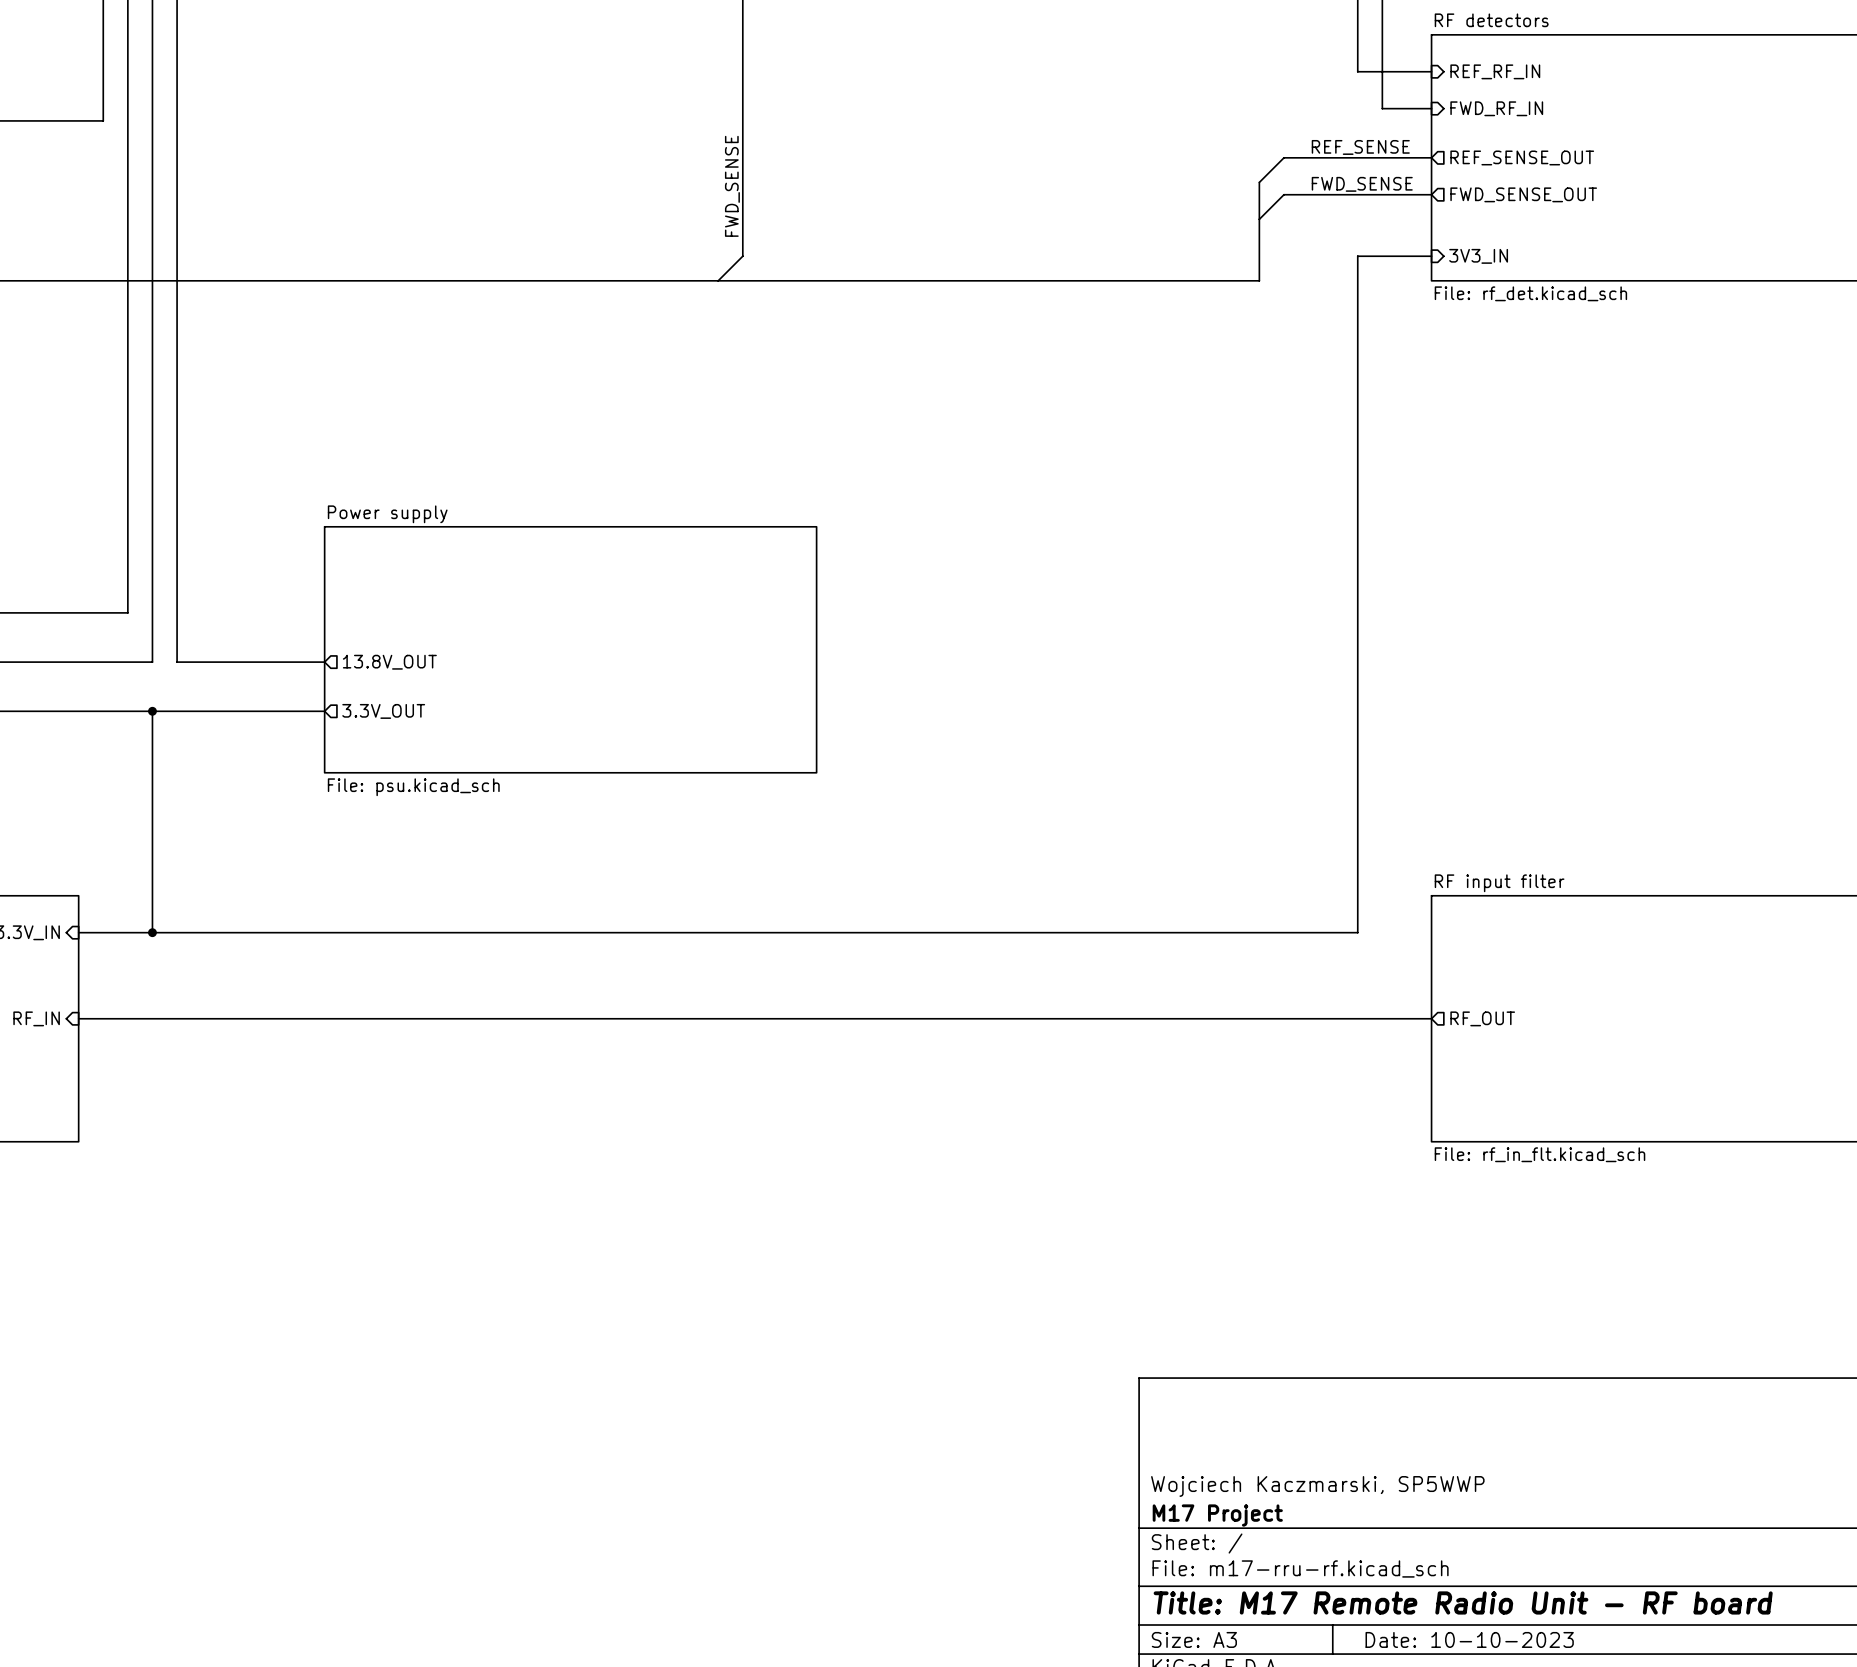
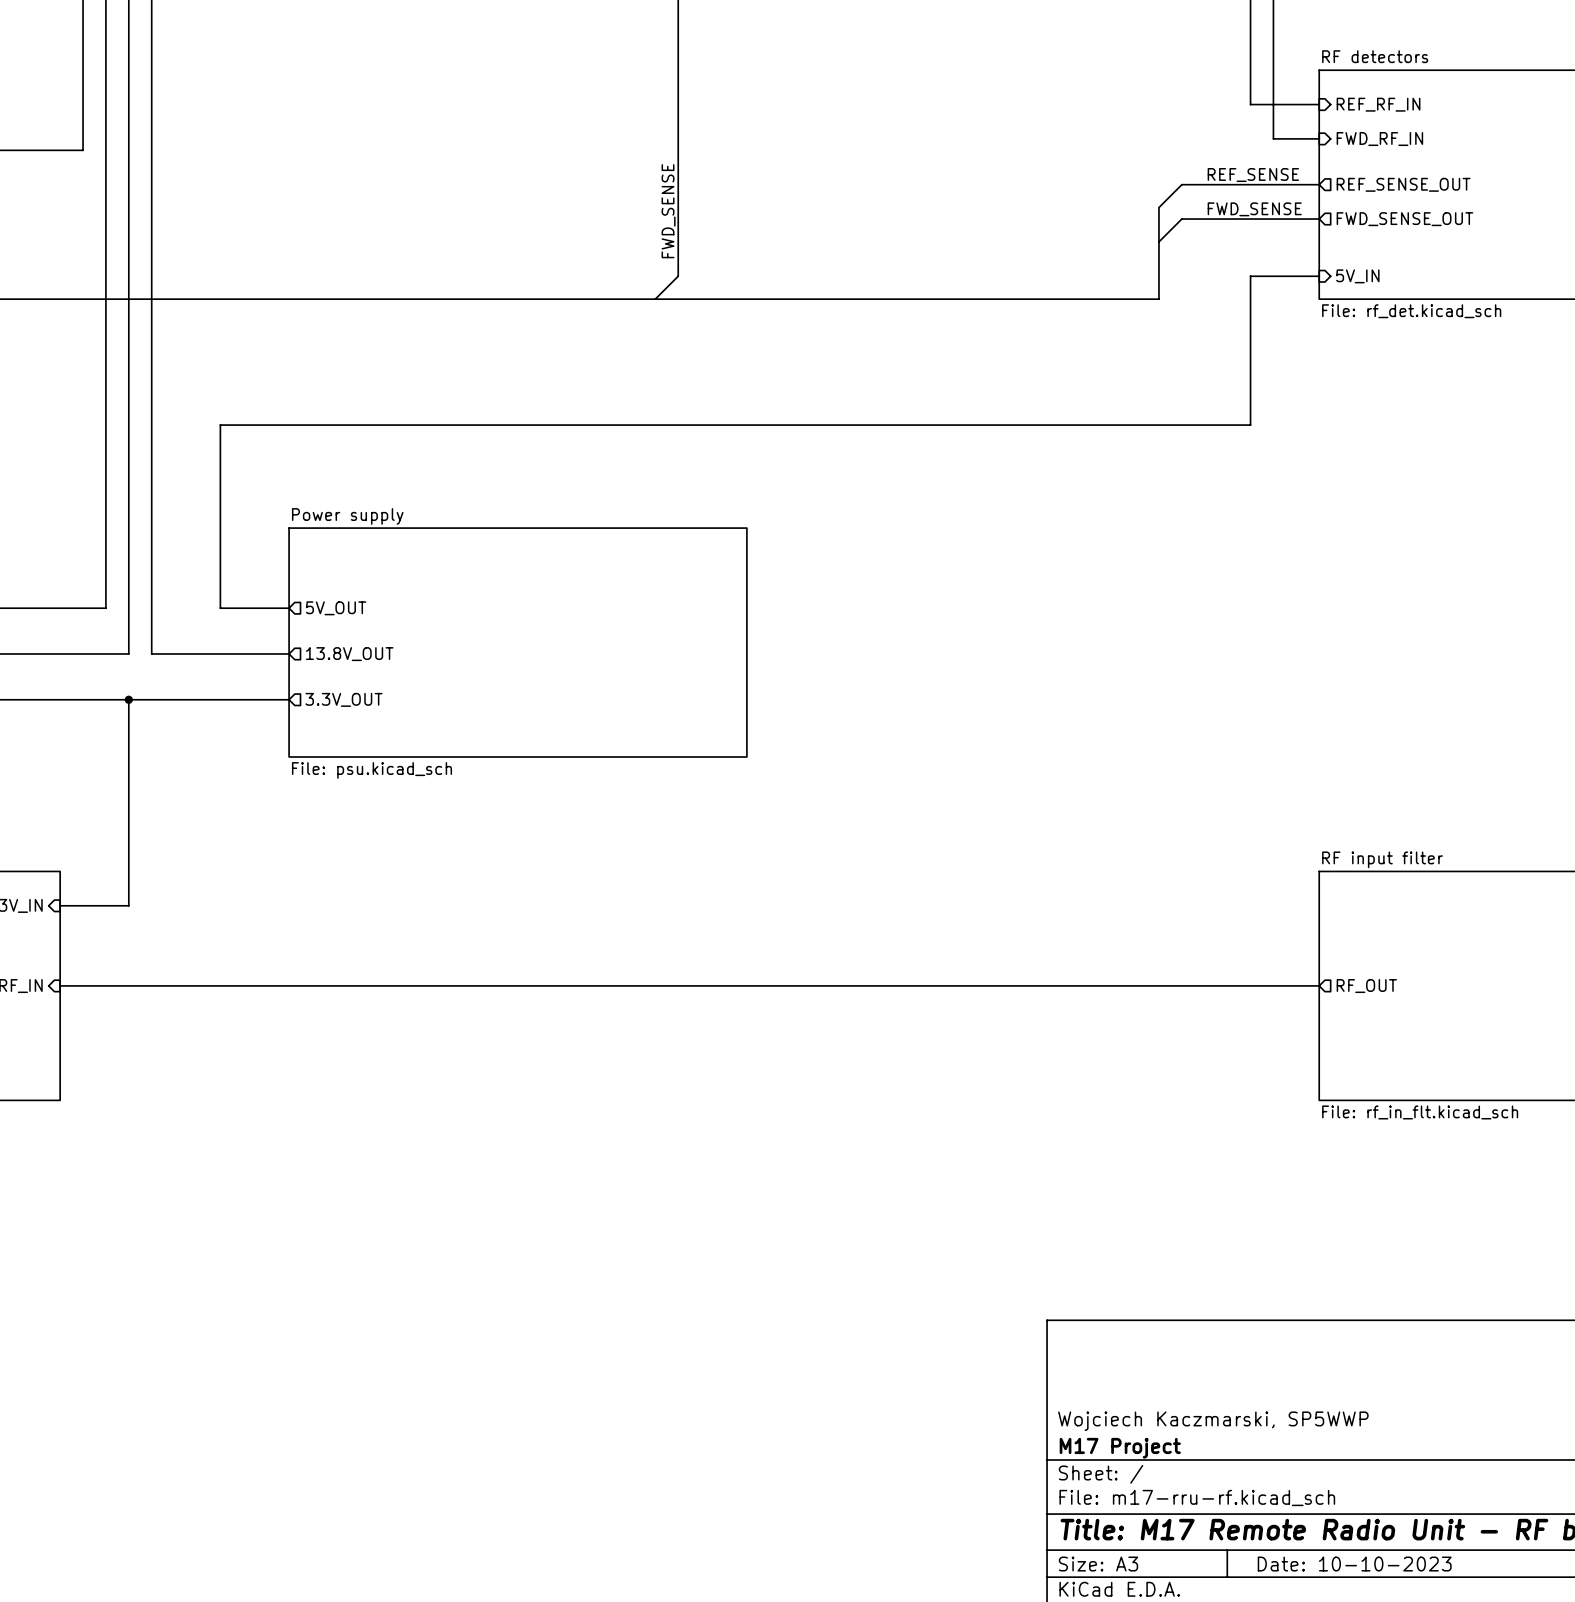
sheet pin: 3V3_IN (1478, 256) -> 5V_IN (1357, 276)
wire: (1357, 416) (1357, 932) (152, 932) -> (1250, 425) (220, 425) (220, 608) (289, 608)
sheet pin: none -> 5V_OUT (336, 608)
junction: (152, 932) -> none

